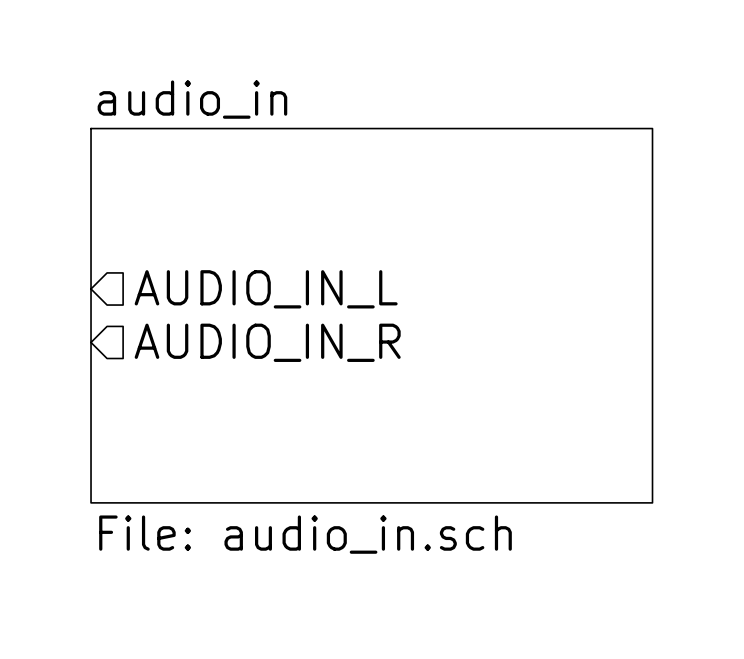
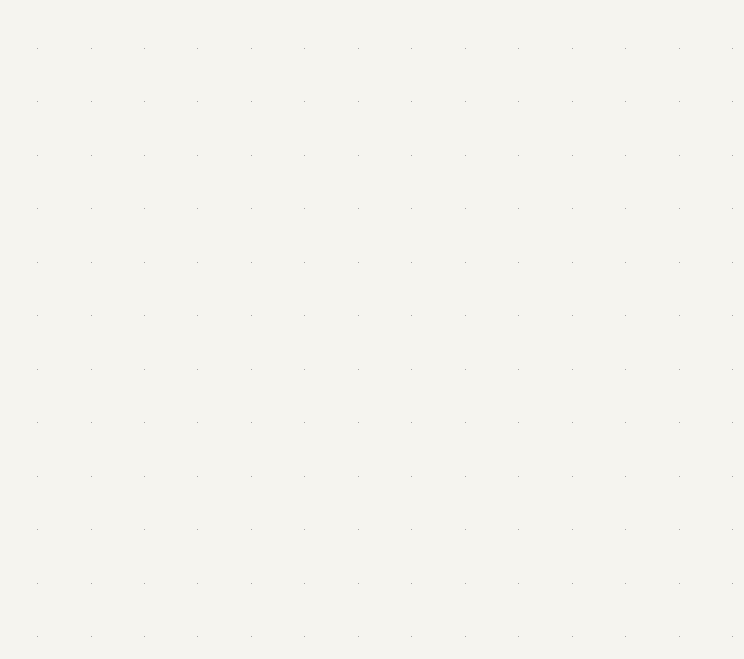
sheet pin: AUDIO_IN_L (266, 289) -> none
sheet audio_in: File: audio_in.sch (371, 315) -> none
sheet pin: AUDIO_IN_R (267, 342) -> none

